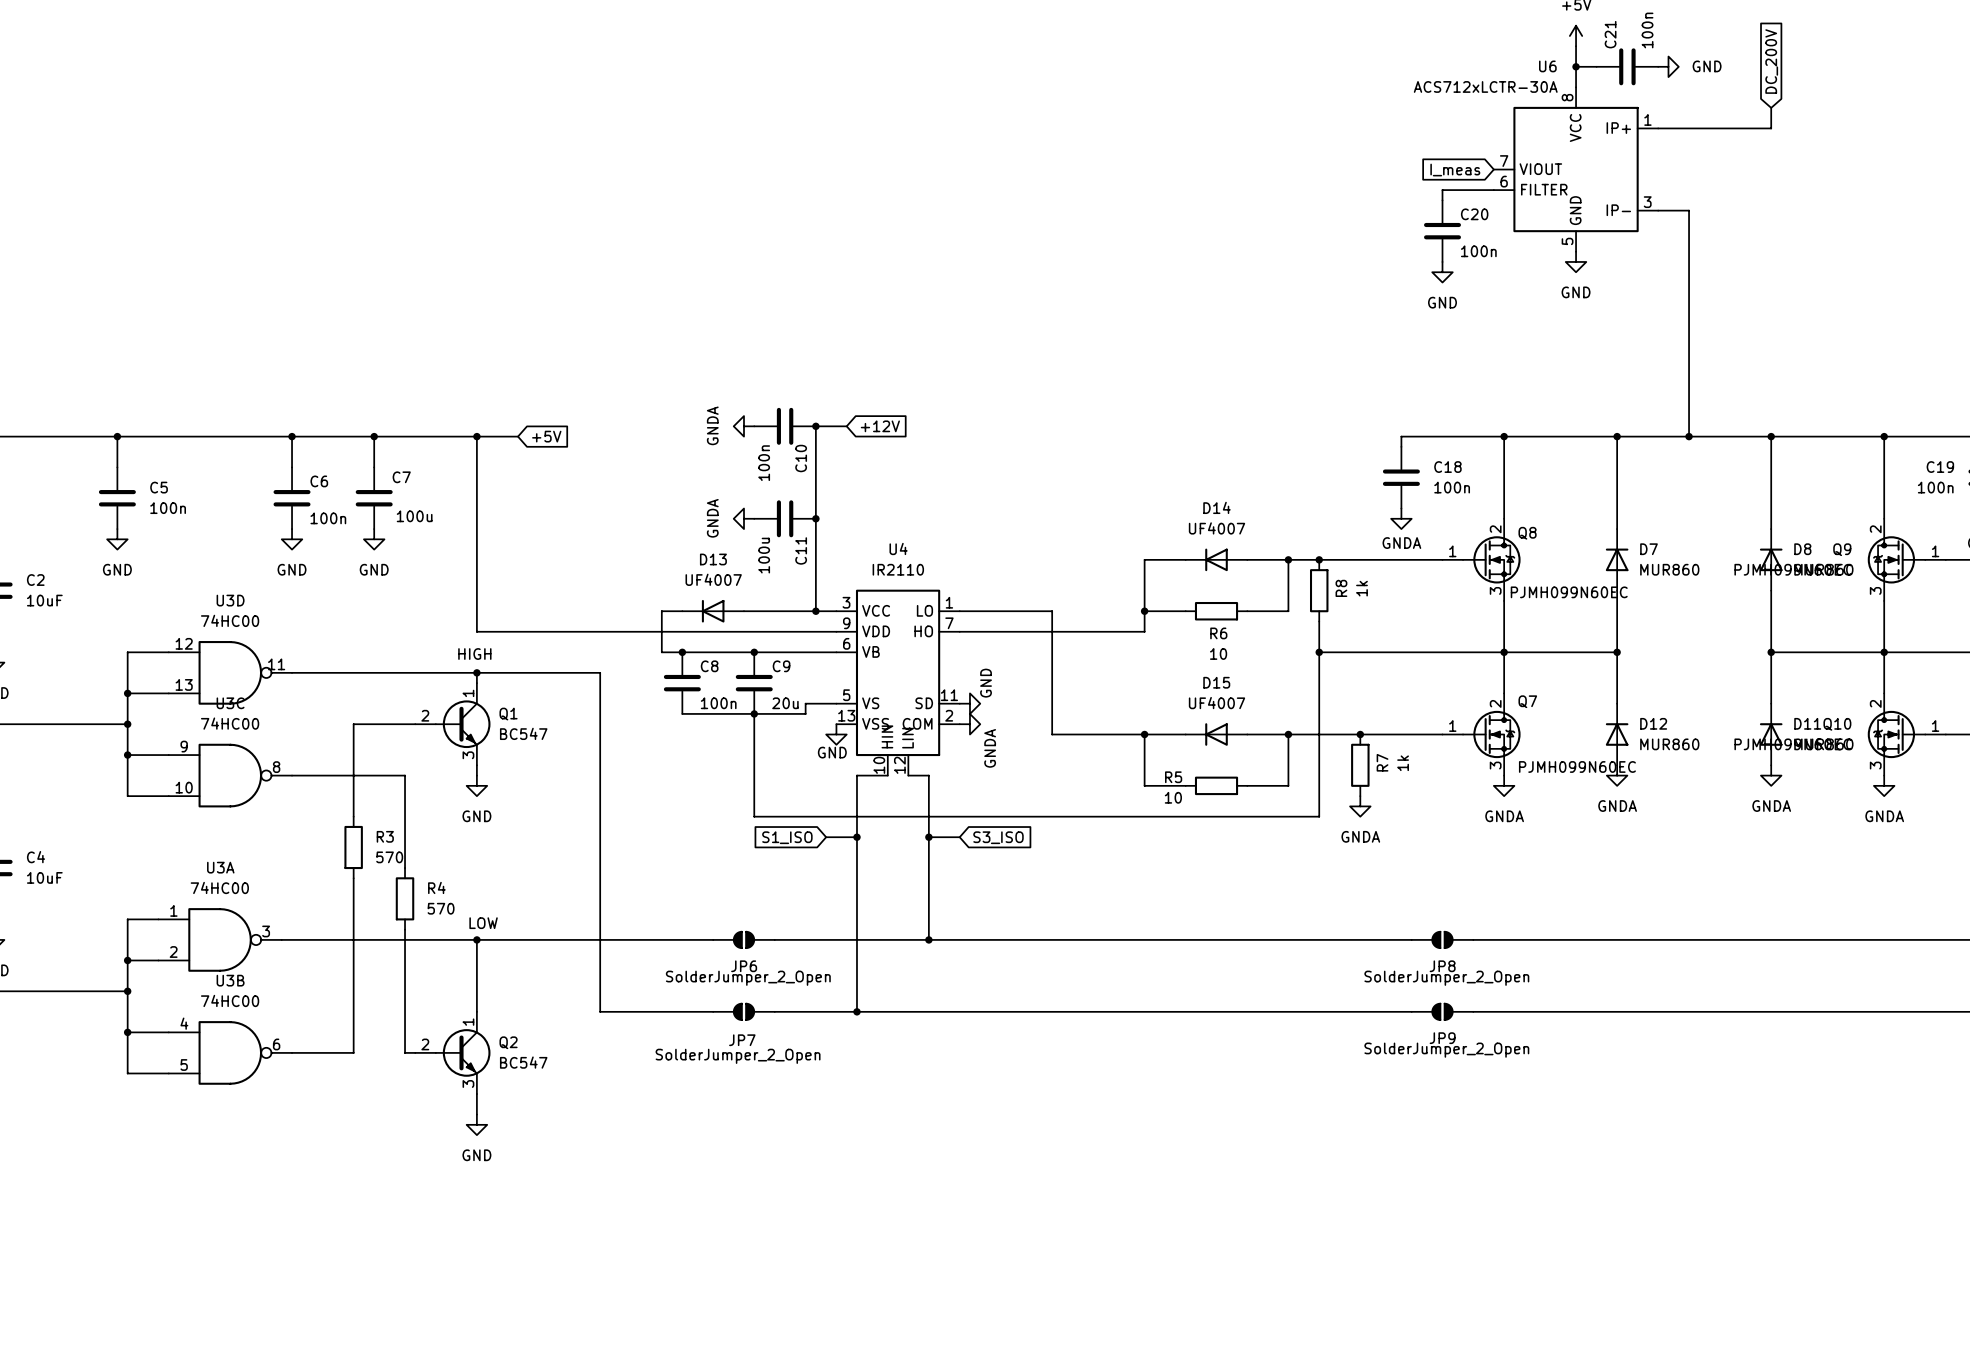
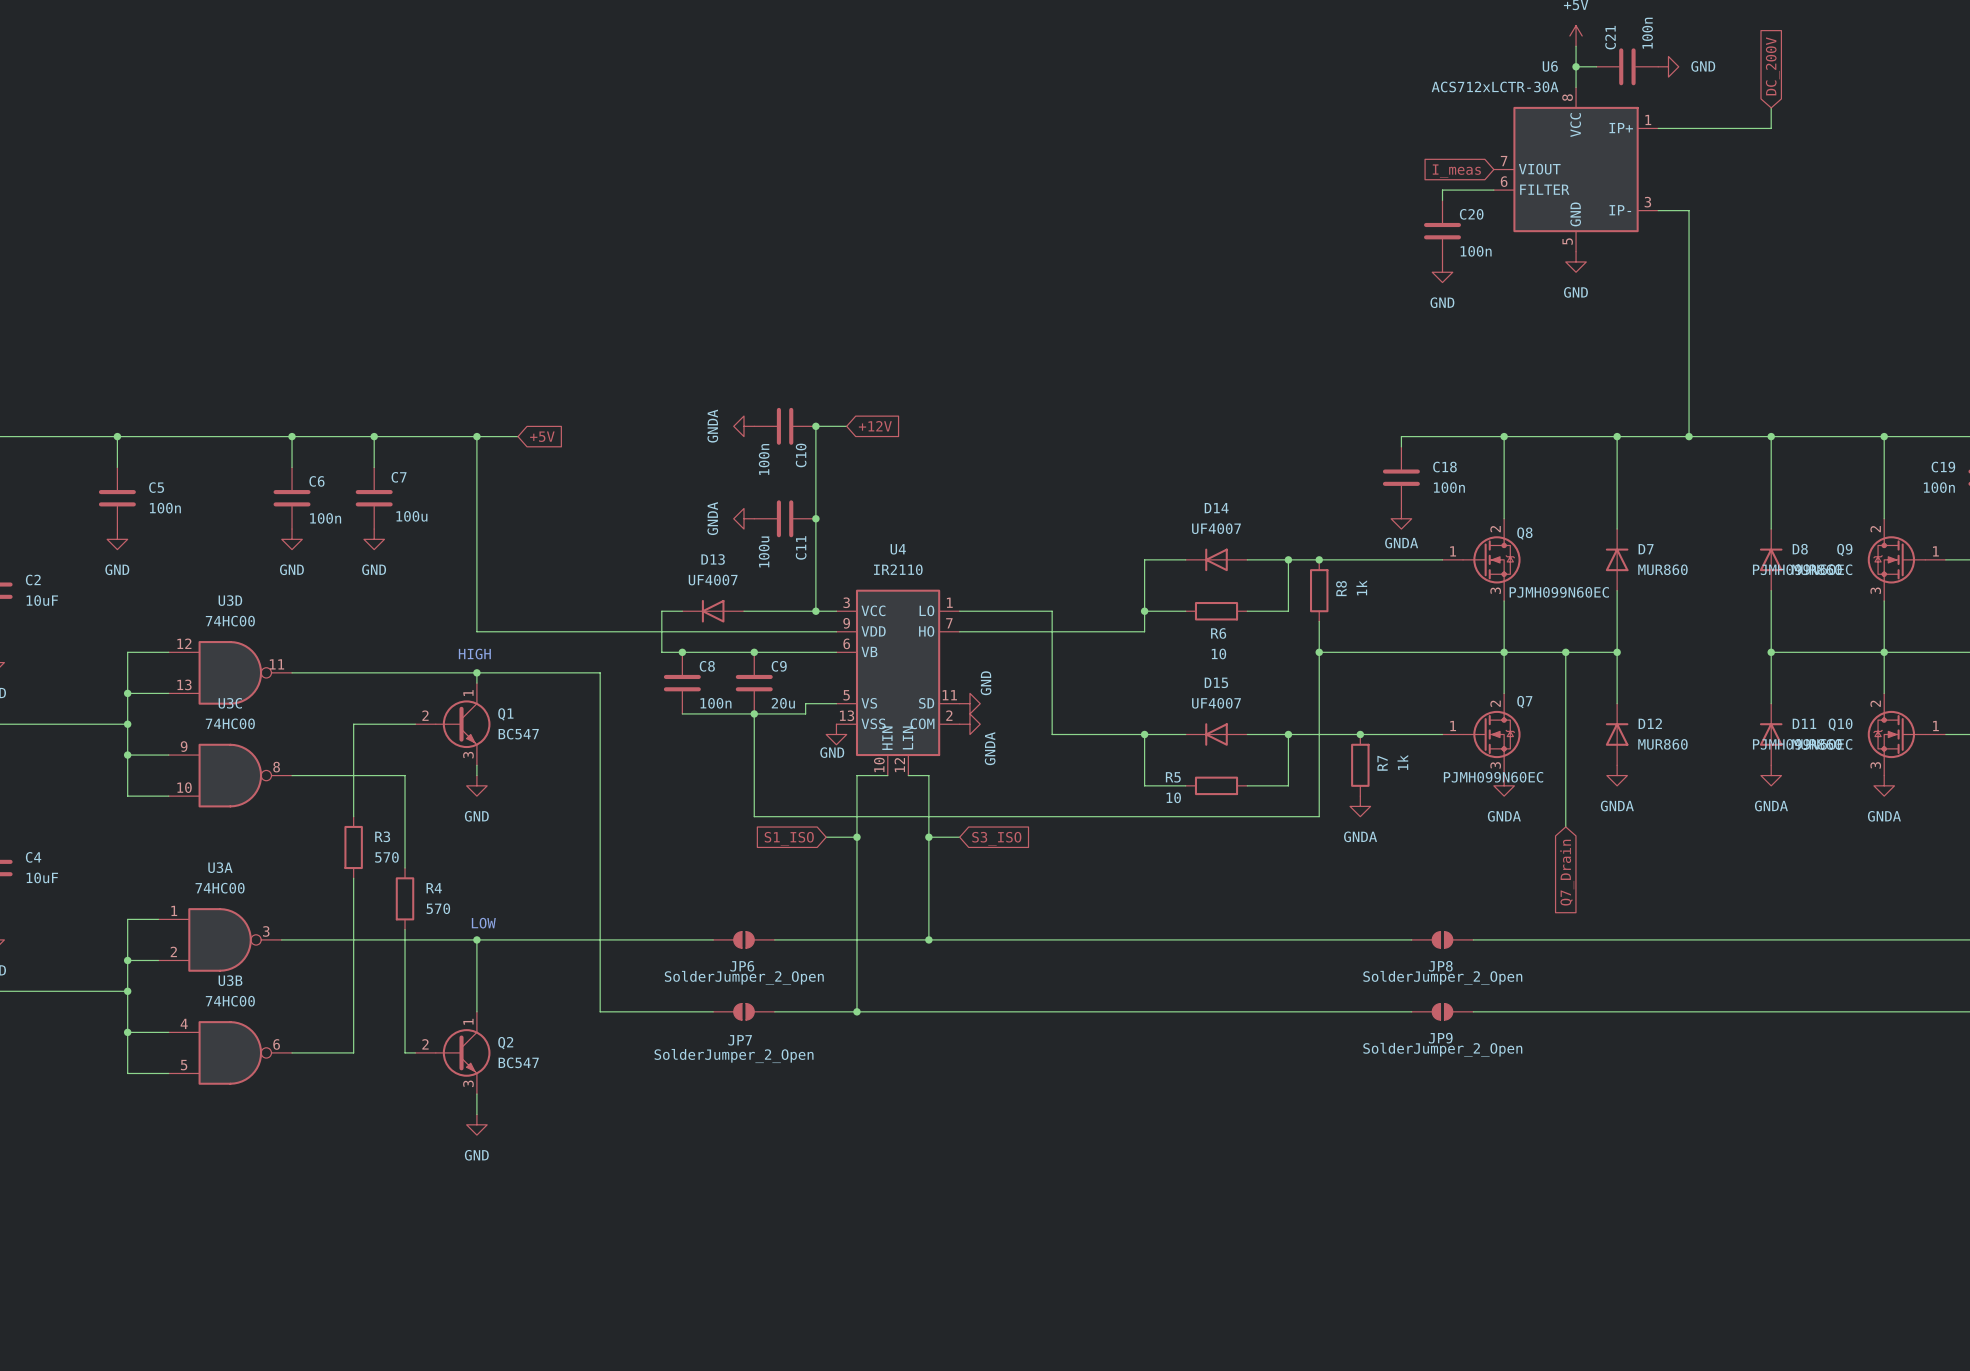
wire: none -> (1565, 652) (1565, 826)
junction: none -> (1565, 652)
Q7 value position: PJMH099N60EC (1577, 766) -> PJMH099N60EC (1493, 777)
global label: none -> Q7_Drain (1567, 872)

